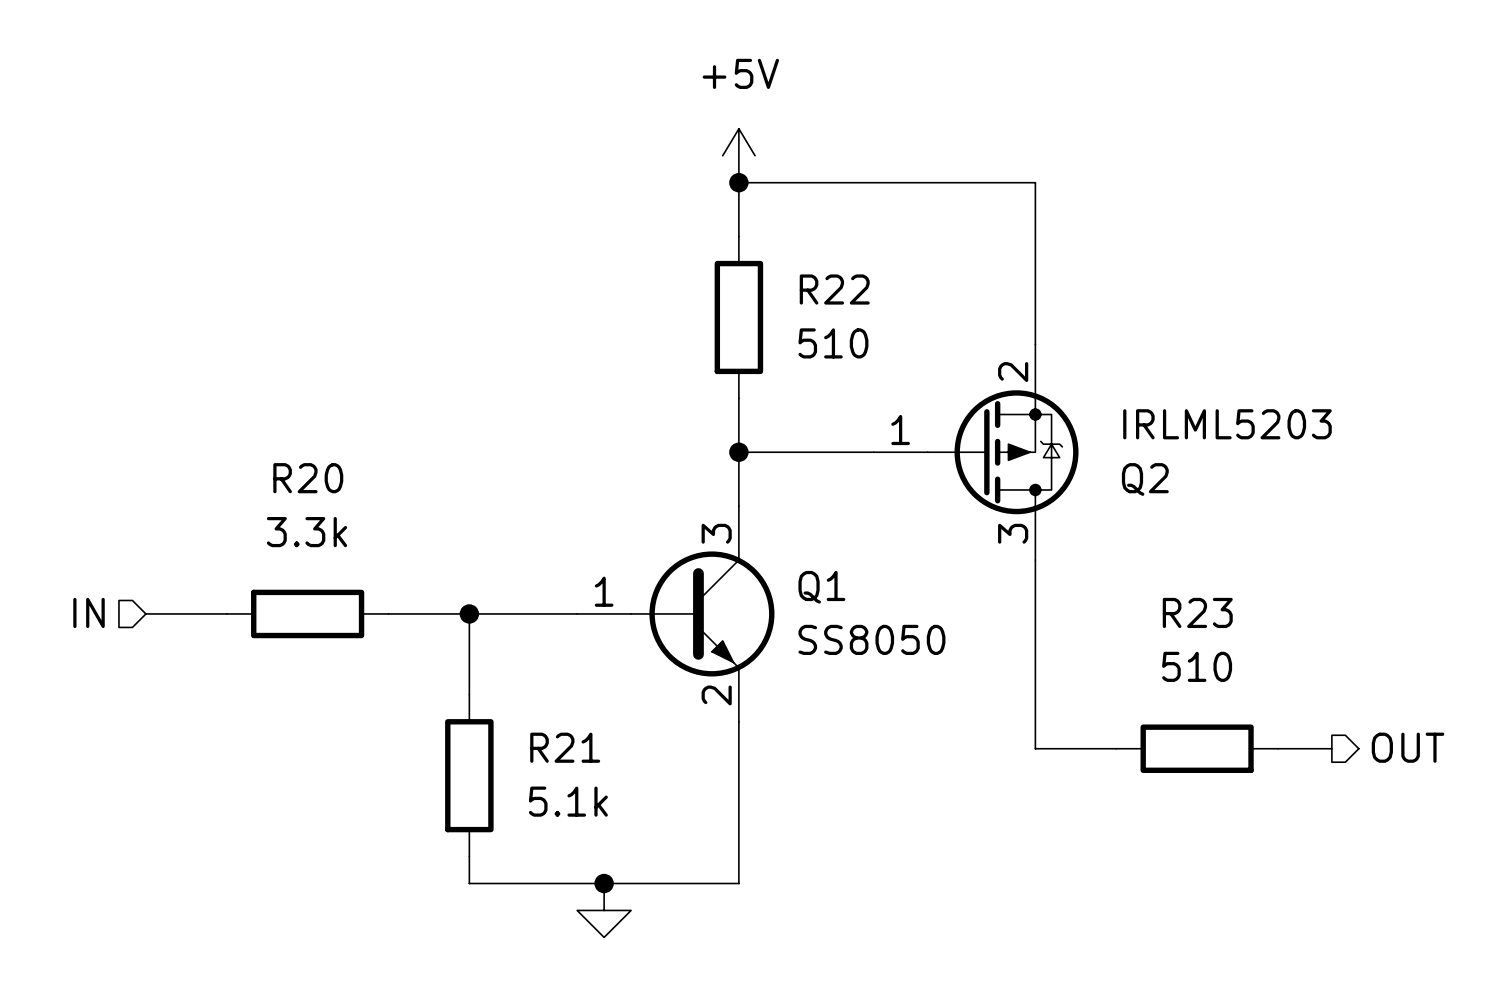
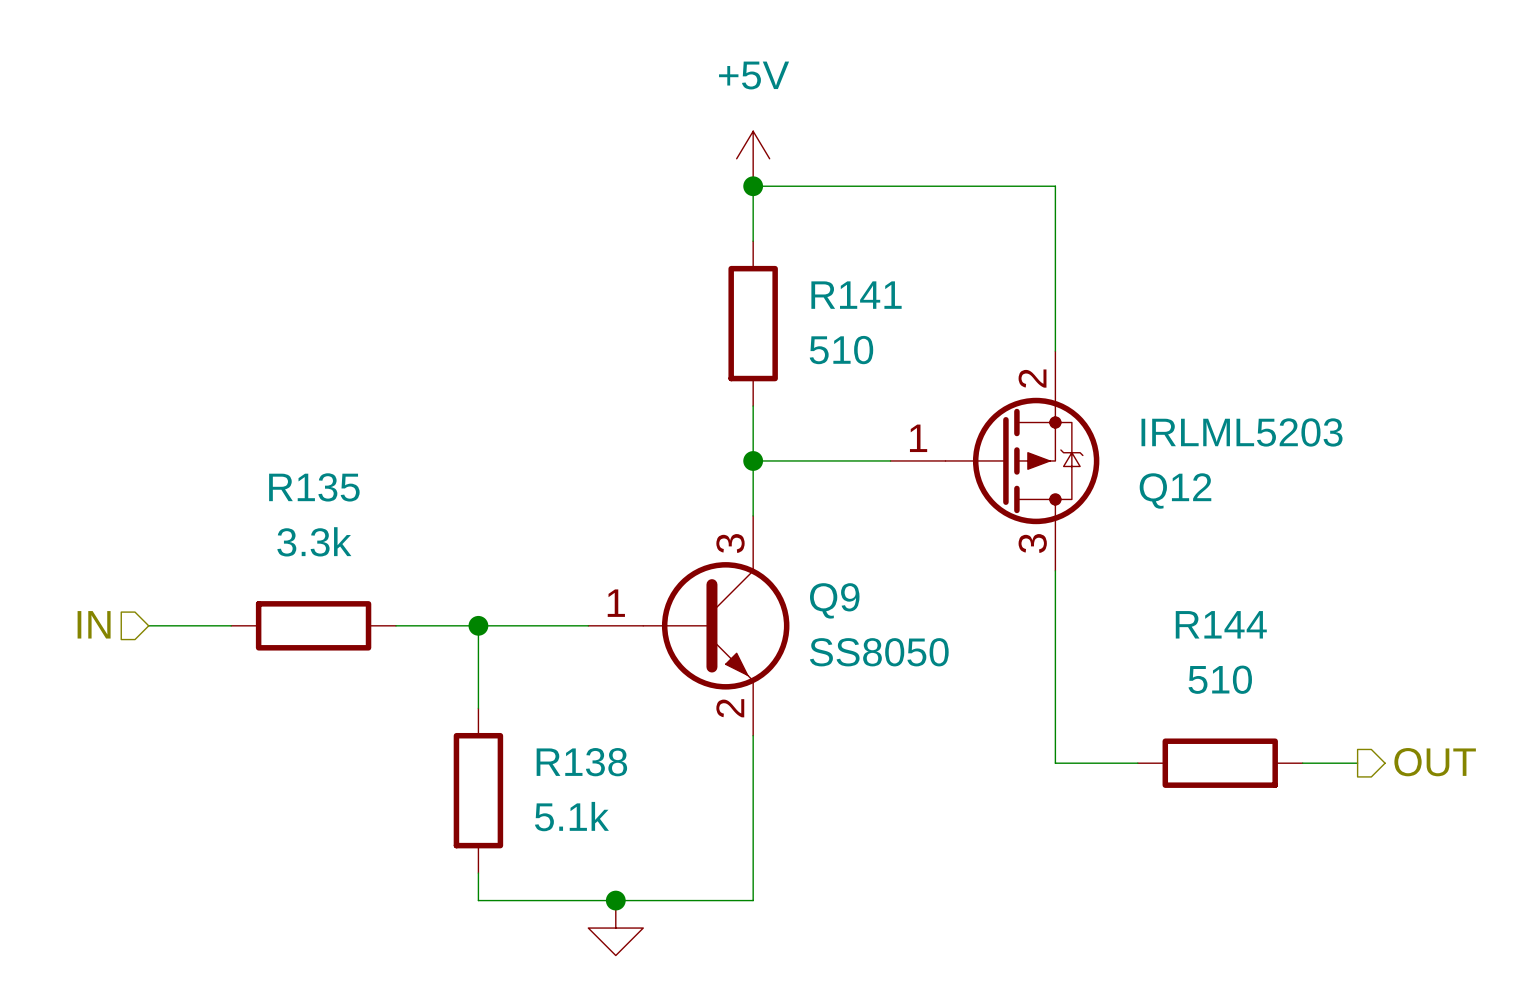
R22 name: R22 (834, 289) -> R141 (856, 295)
R20 name: R20 (308, 478) -> R135 (314, 487)
Q2 name: Q2 (1145, 479) -> Q12 (1175, 490)
Q1 name: Q1 (821, 587) -> Q9 (834, 600)
R23 name: R23 (1197, 612) -> R144 (1221, 624)
R21 name: R21 (565, 747) -> R138 (581, 762)

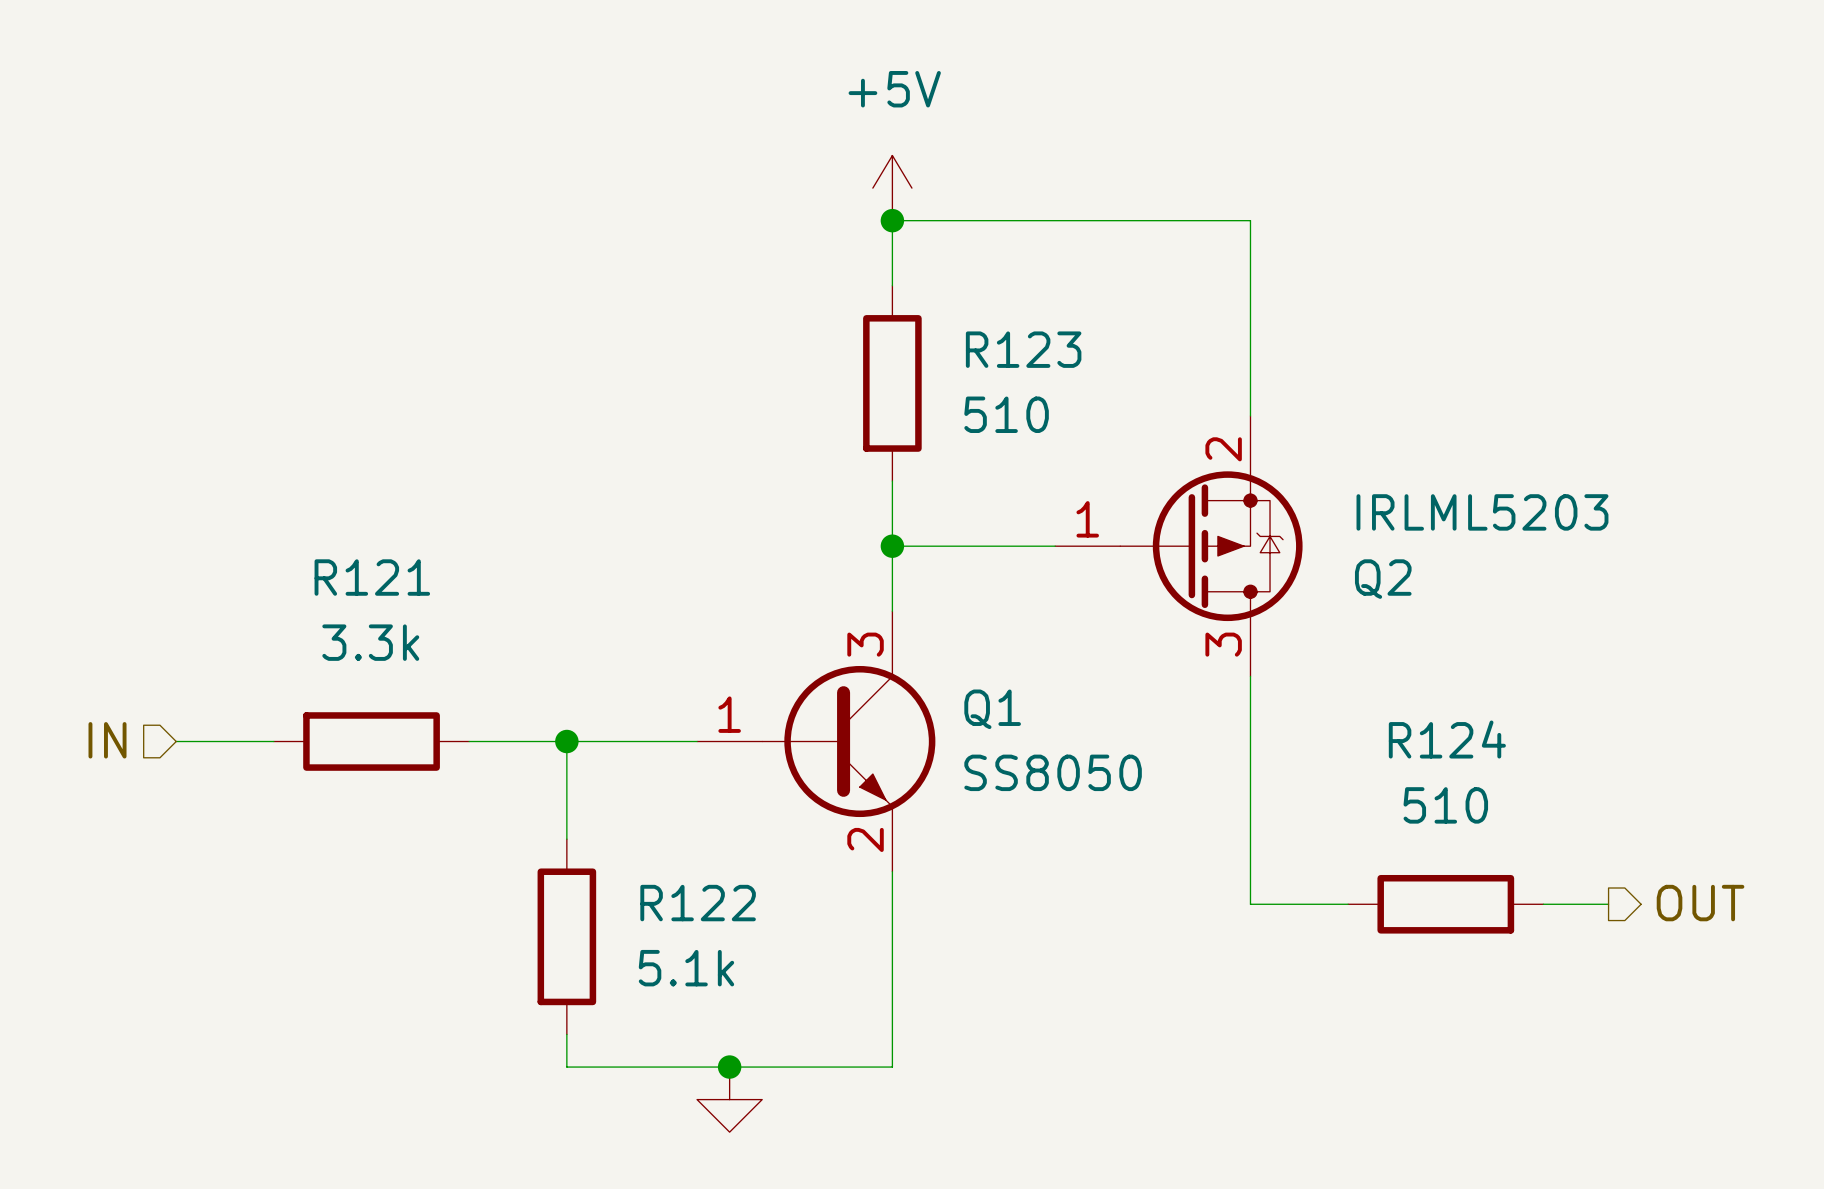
R141 name: R141 (856, 295) -> R123 (1023, 349)
R135 name: R135 (314, 487) -> R121 (372, 577)
Q12 name: Q12 (1175, 490) -> Q2 (1383, 579)
Q9 name: Q9 (834, 600) -> Q1 (992, 709)
R144 name: R144 (1221, 624) -> R124 (1447, 739)
R138 name: R138 (581, 762) -> R122 (698, 903)

